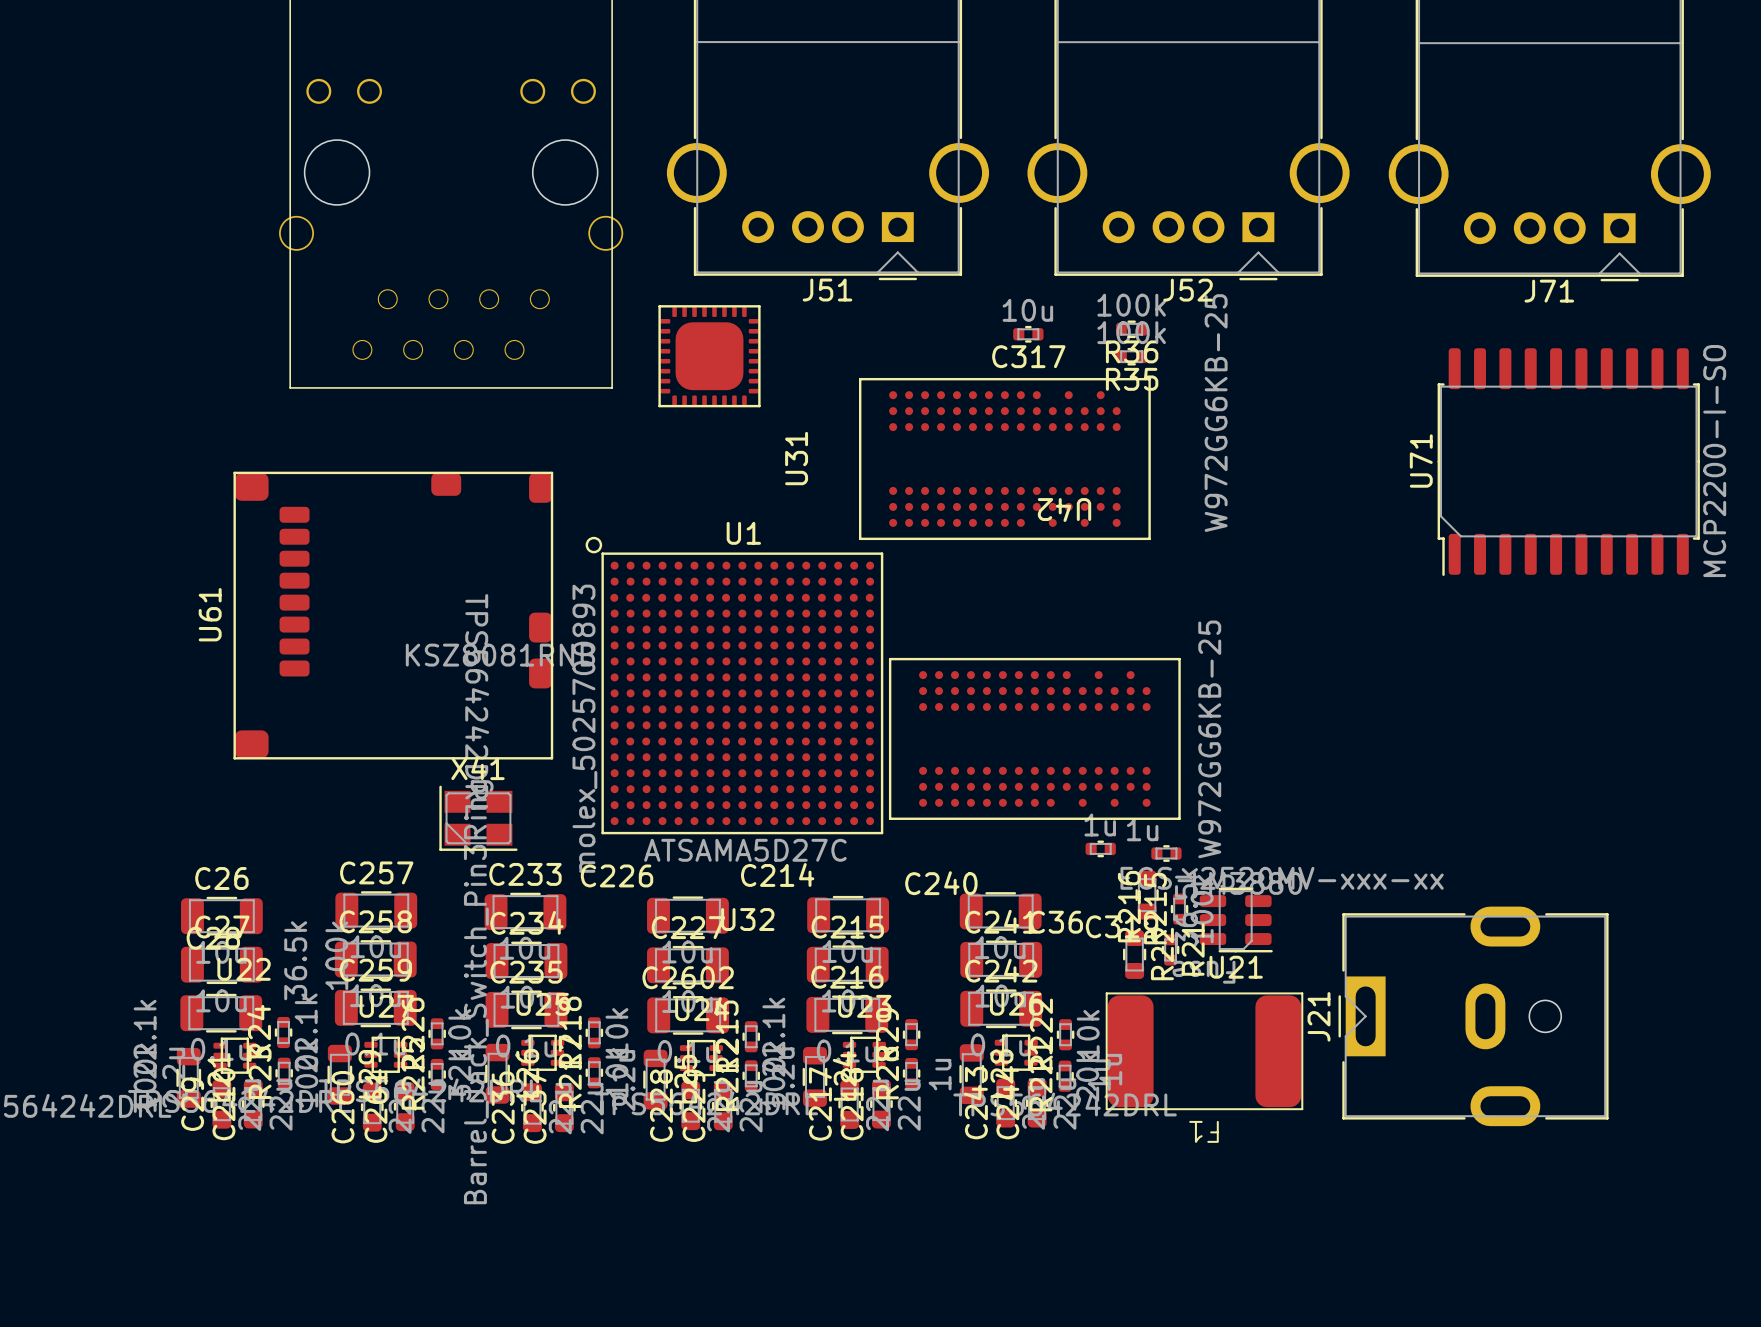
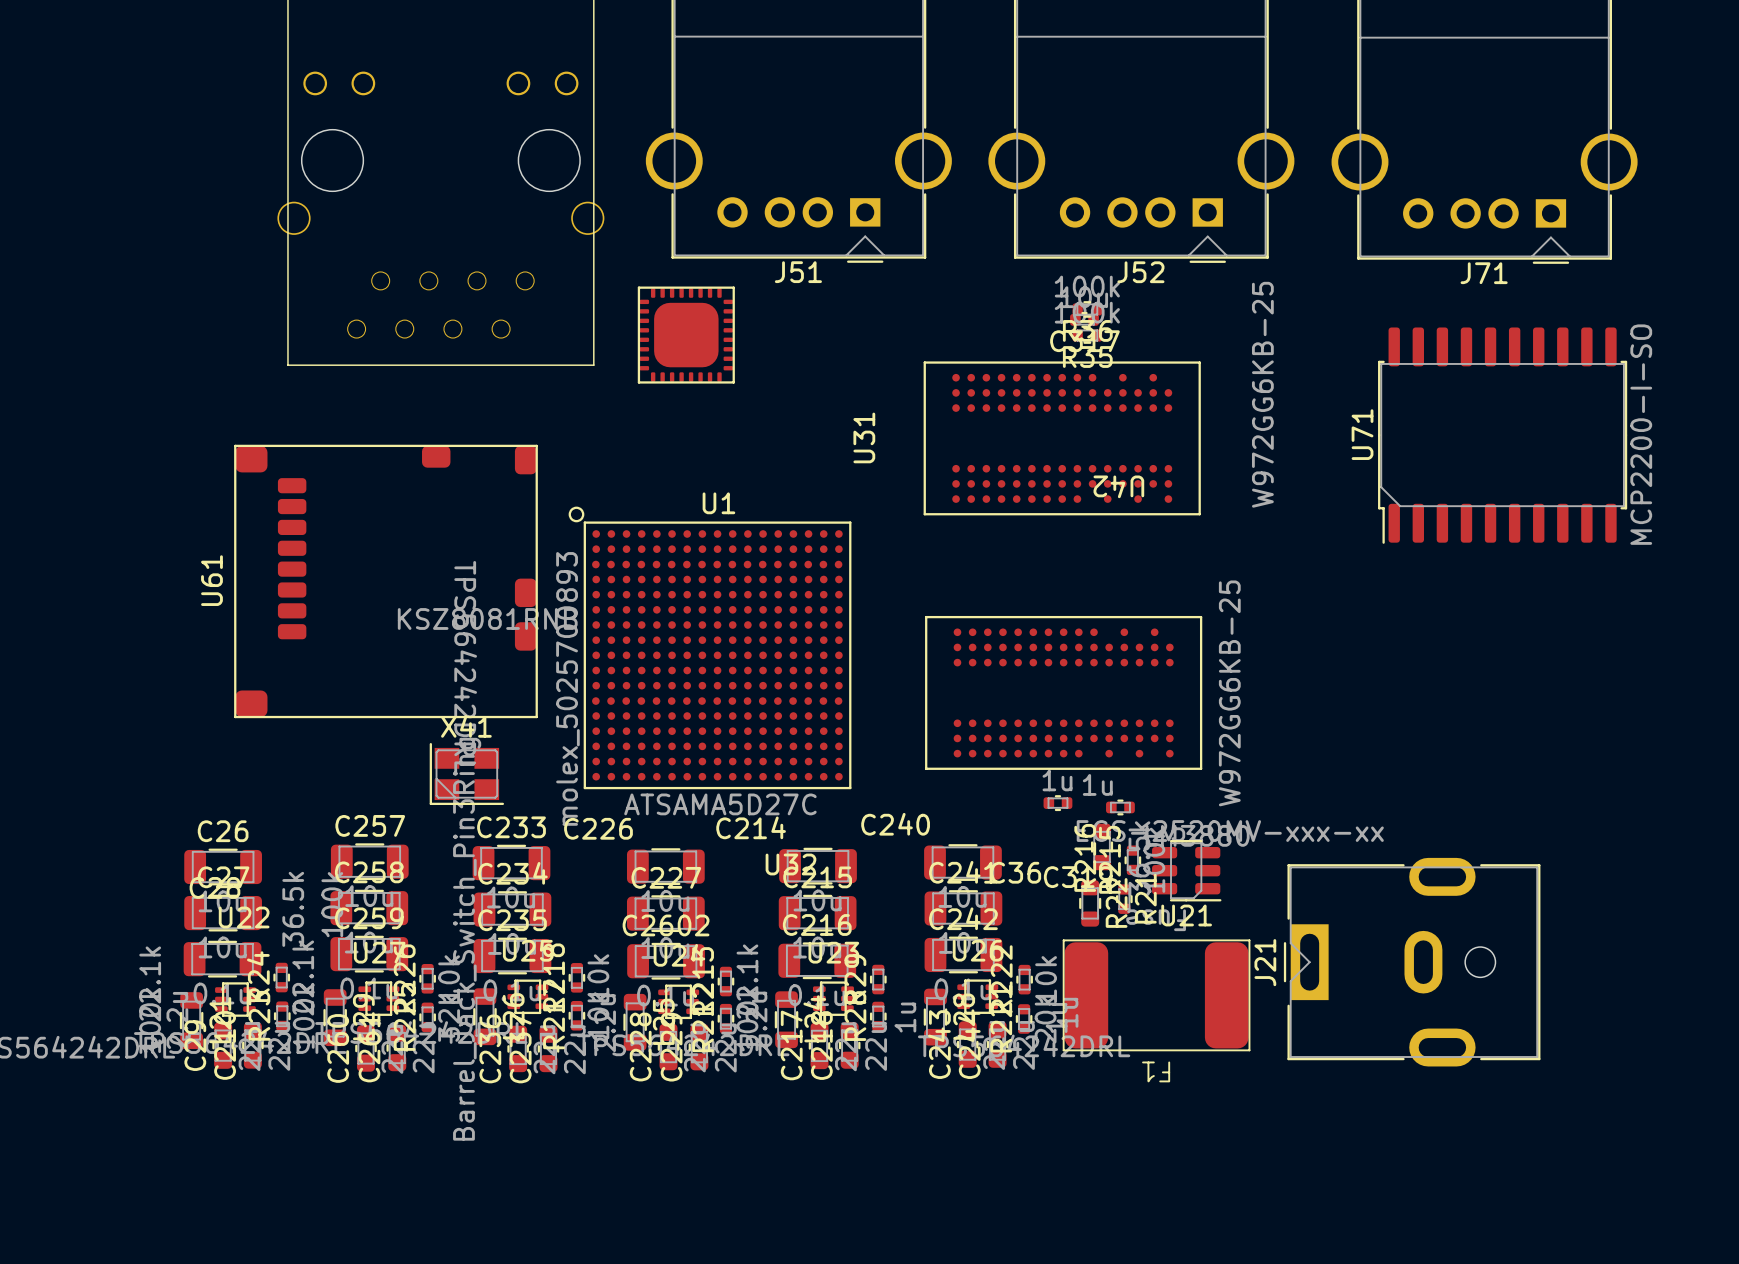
C317 position: (1028, 334) -> (1084, 319)
U31 position: (1004, 459) -> (1062, 438)
U42 name position: U42 (1064, 510) -> U42 (1118, 486)
U32 position: (1034, 738) -> (1063, 692)
C240 name position: C240 (941, 883) -> C240 (895, 824)

